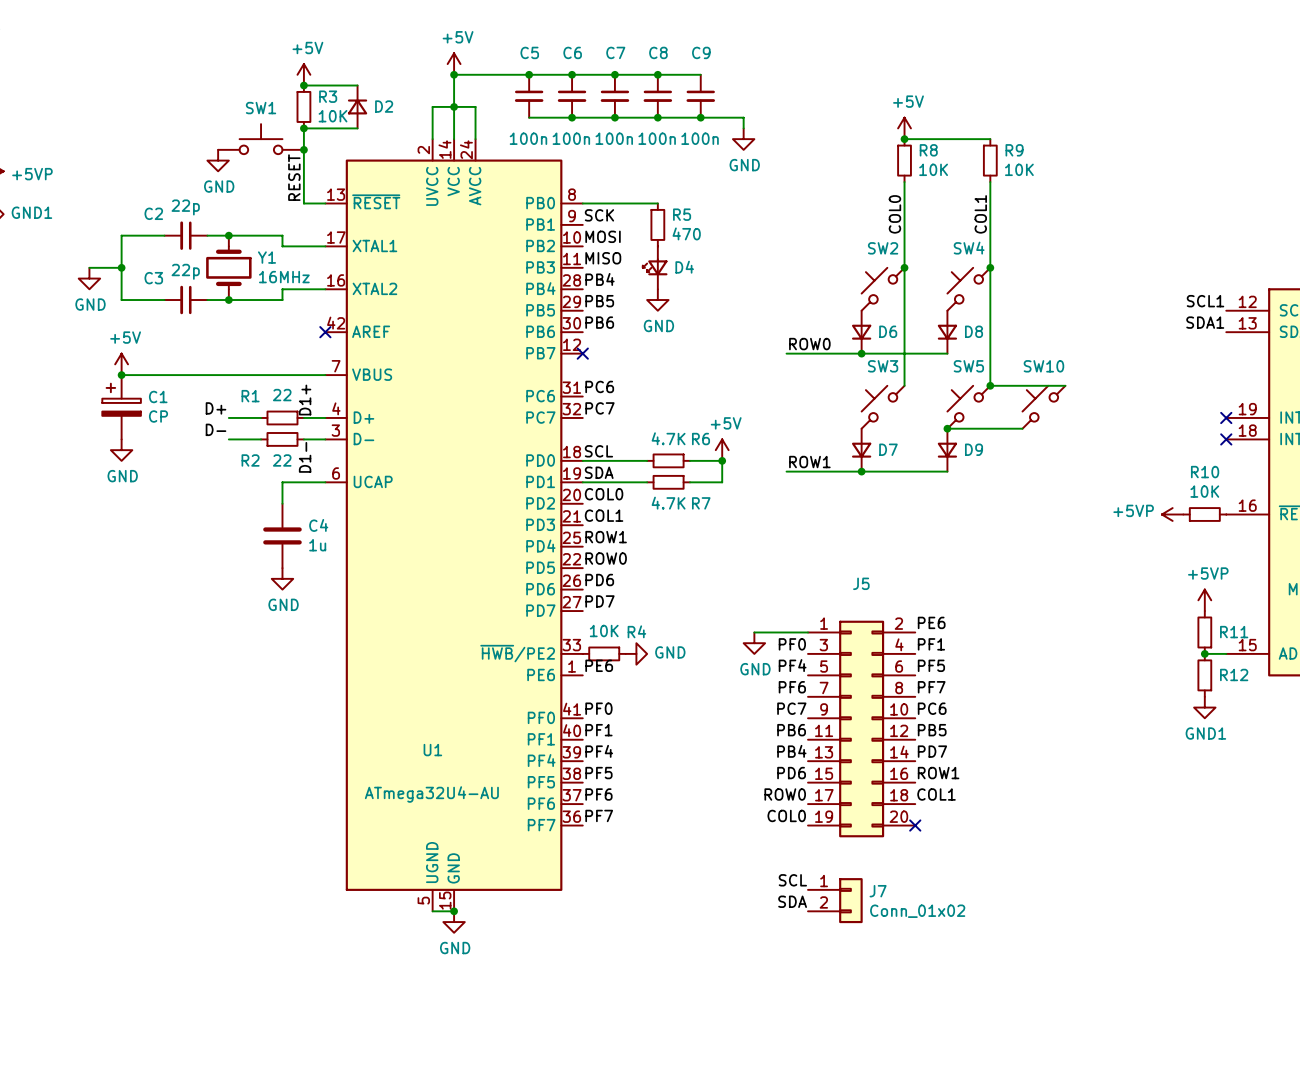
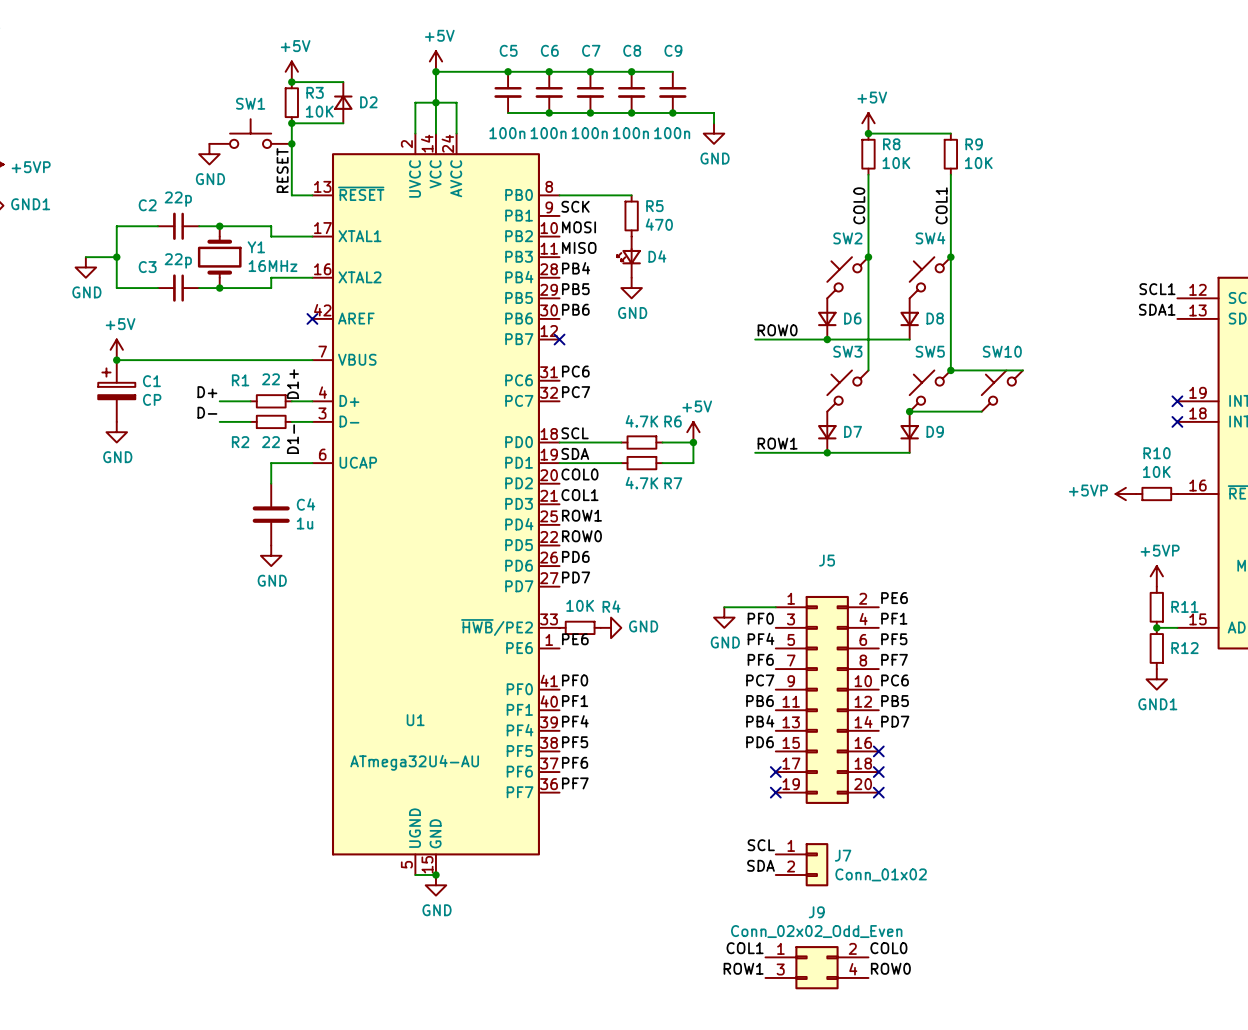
label: ROW1 (938, 773) -> none
no-connect mark: none -> (878, 751)
label: ROW0 (785, 794) -> none
label: COL1 (936, 794) -> none
no-connect mark: none -> (775, 772)
no-connect mark: none -> (878, 772)
label position: COL0 (786, 815) -> COL0 (888, 948)
no-connect mark: none -> (775, 792)
label: none -> COL1 (745, 948)
J9: none -> Conn_02x02_Odd_Even (816, 967)
label: none -> ROW1 (743, 968)
label: none -> ROW0 (890, 968)

